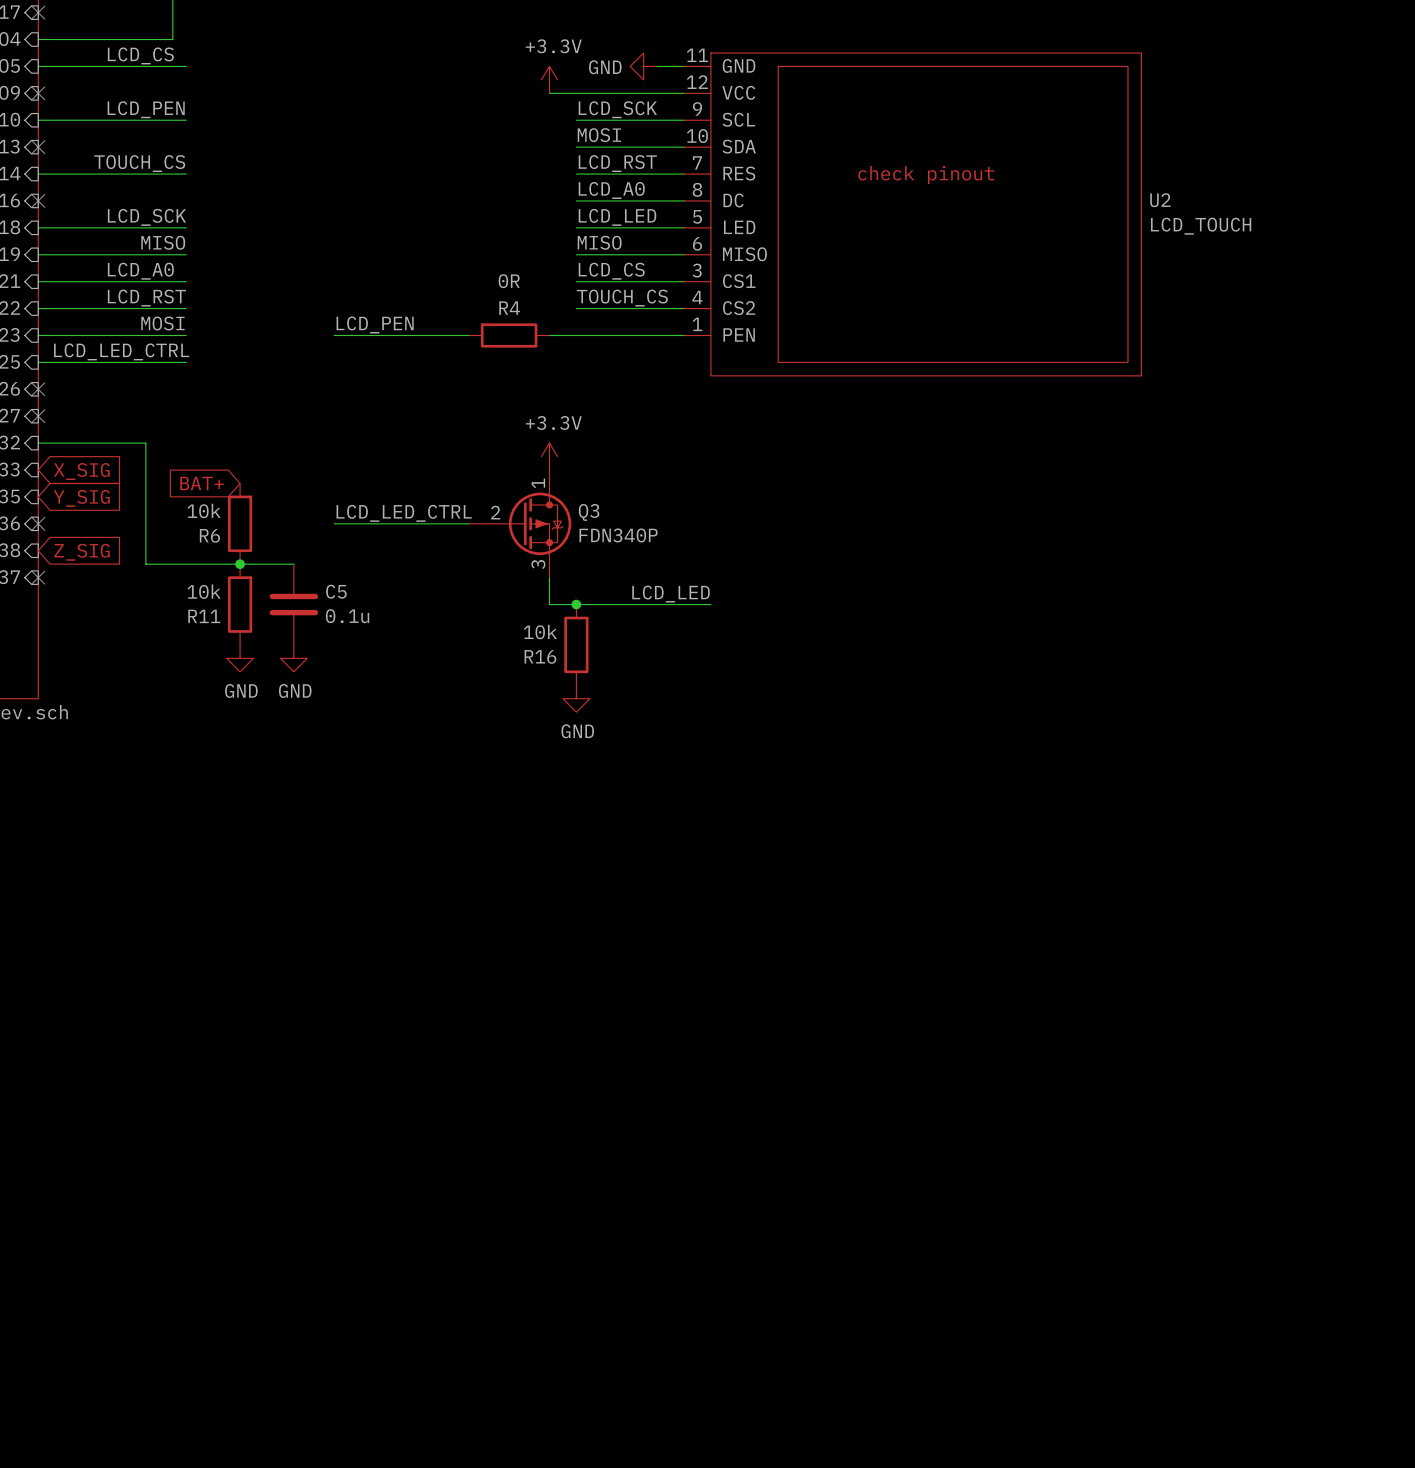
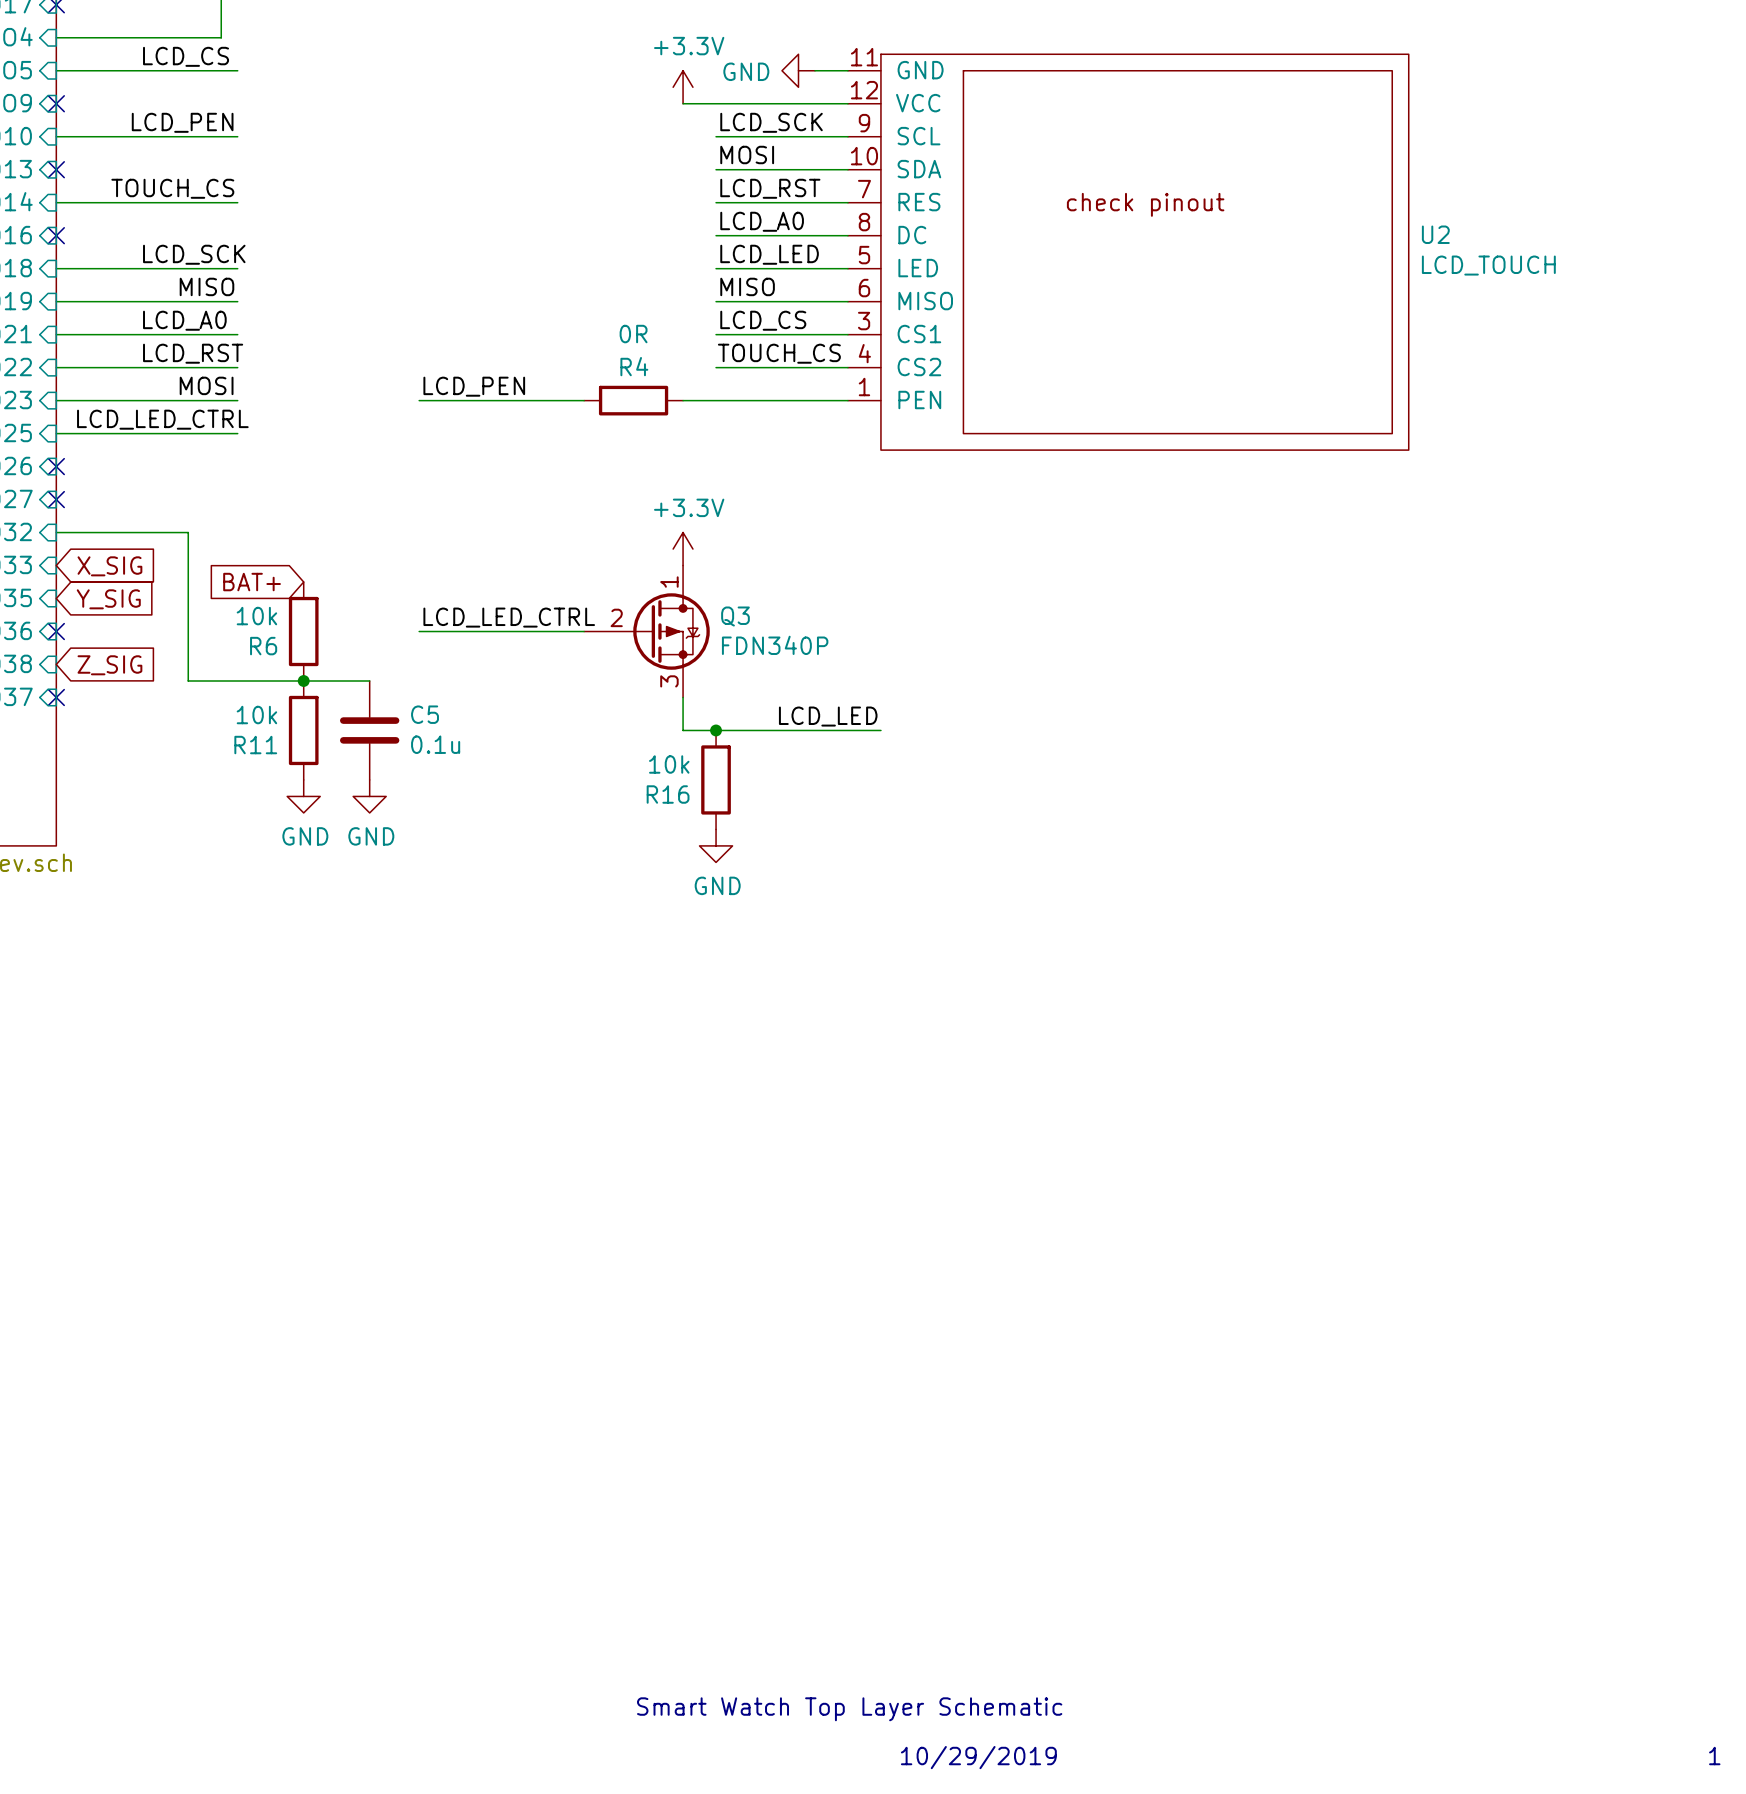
text: none -> Smart Watch Top Layer Schematic (849, 1709)
text: none -> 10/29/2019 (978, 1757)
text: none -> 1 (1714, 1756)

